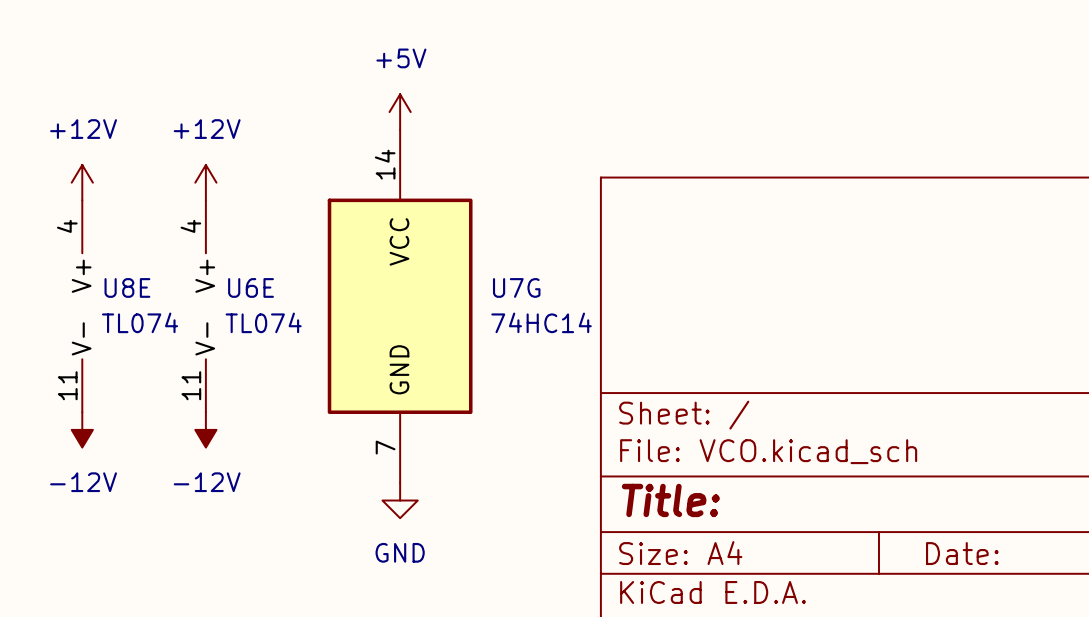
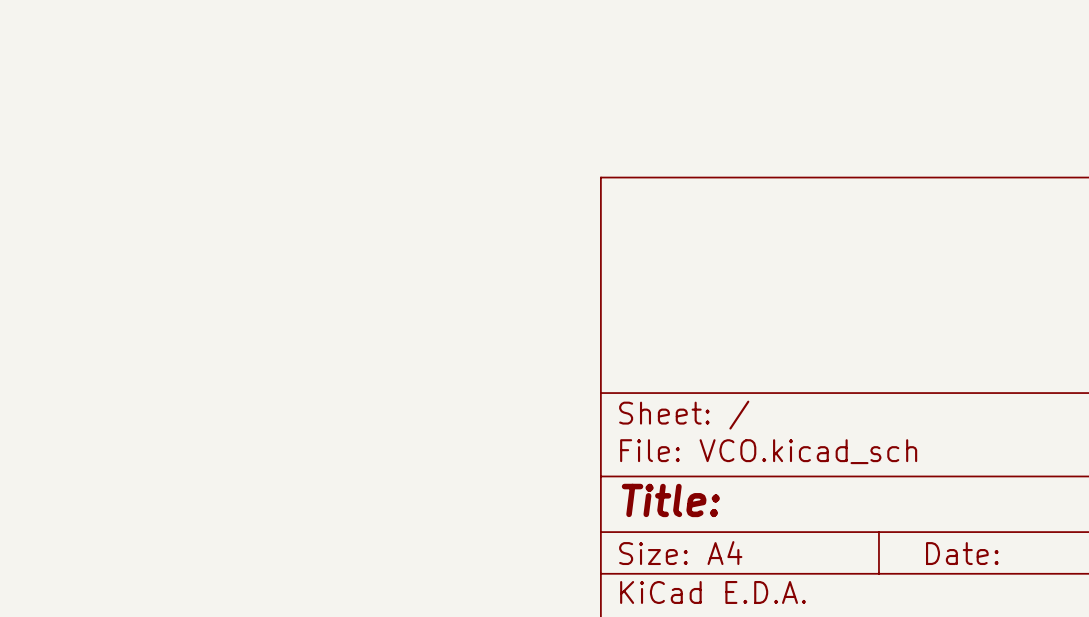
power symbol: +5V (400, 112) -> none
power symbol: +12V (82, 182) -> none
power symbol: +12V (205, 182) -> none
U8E: TL074 (82, 306) -> none
U6E: TL074 (205, 306) -> none
U7G: 74HC14 (400, 306) -> none
power symbol: -12V (82, 429) -> none
power symbol: -12V (205, 429) -> none
power symbol: GND (400, 500) -> none

